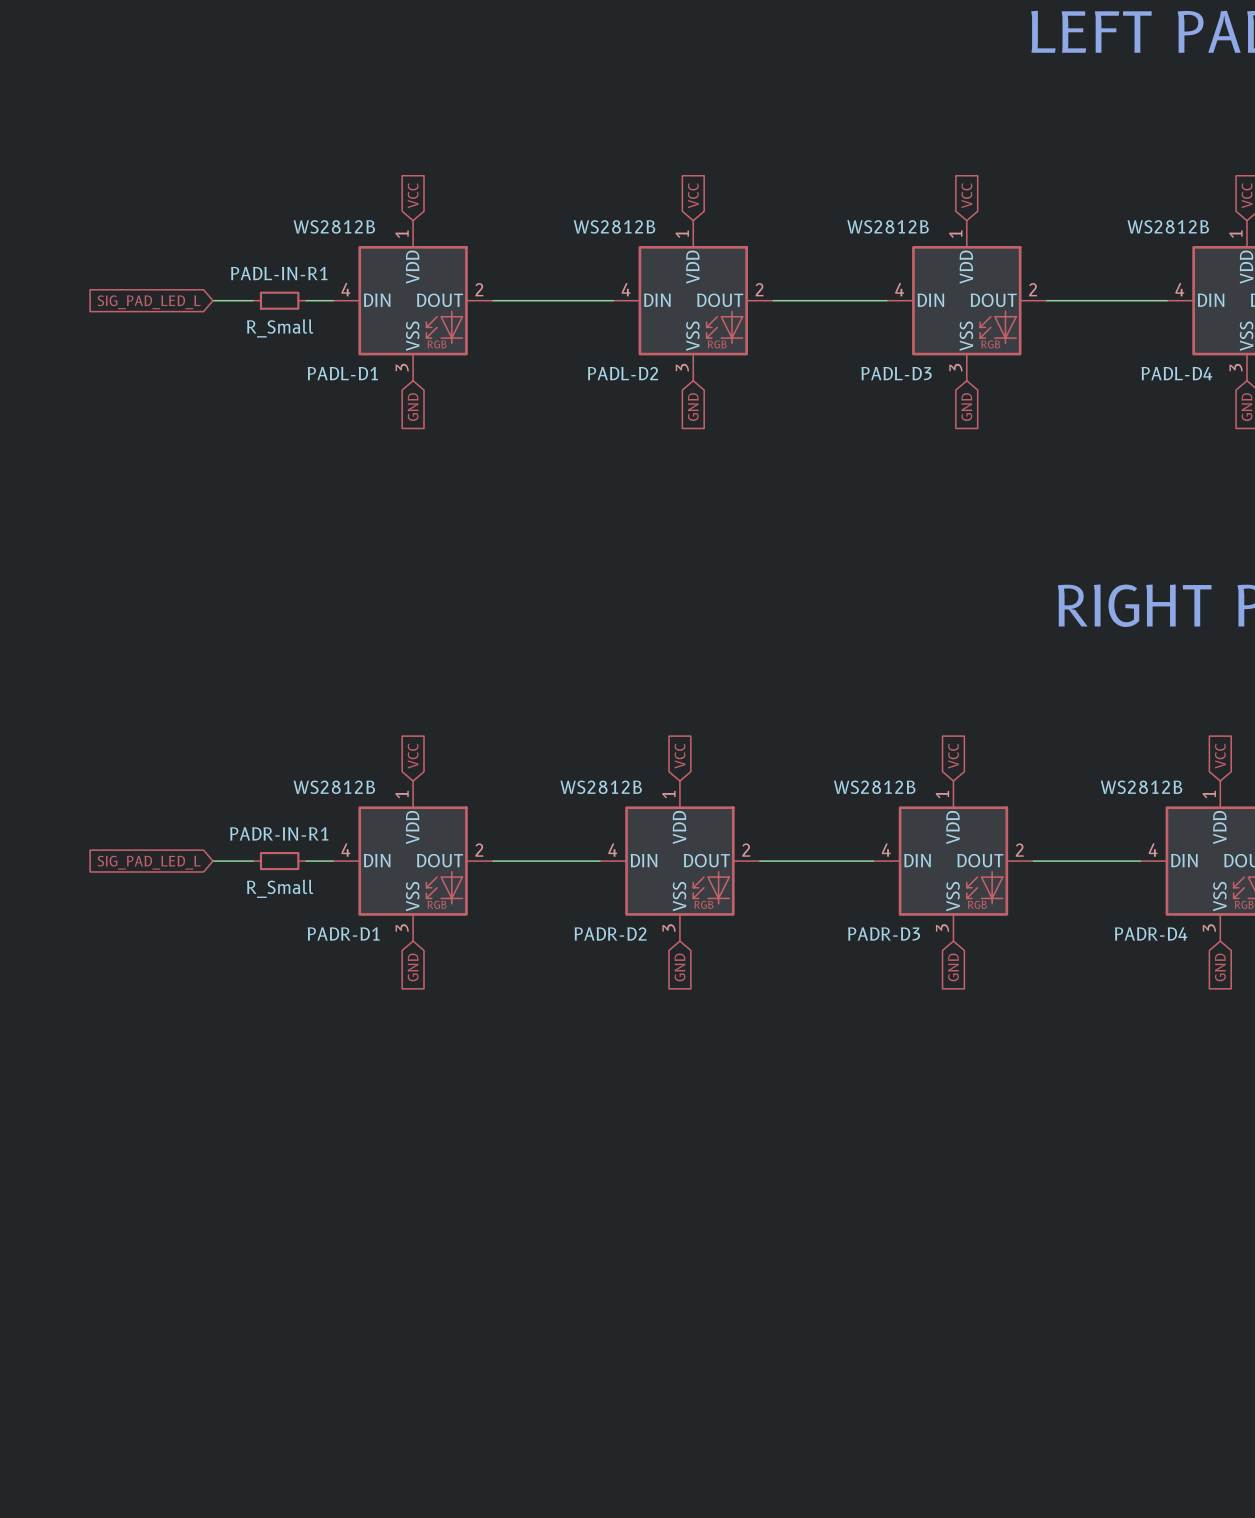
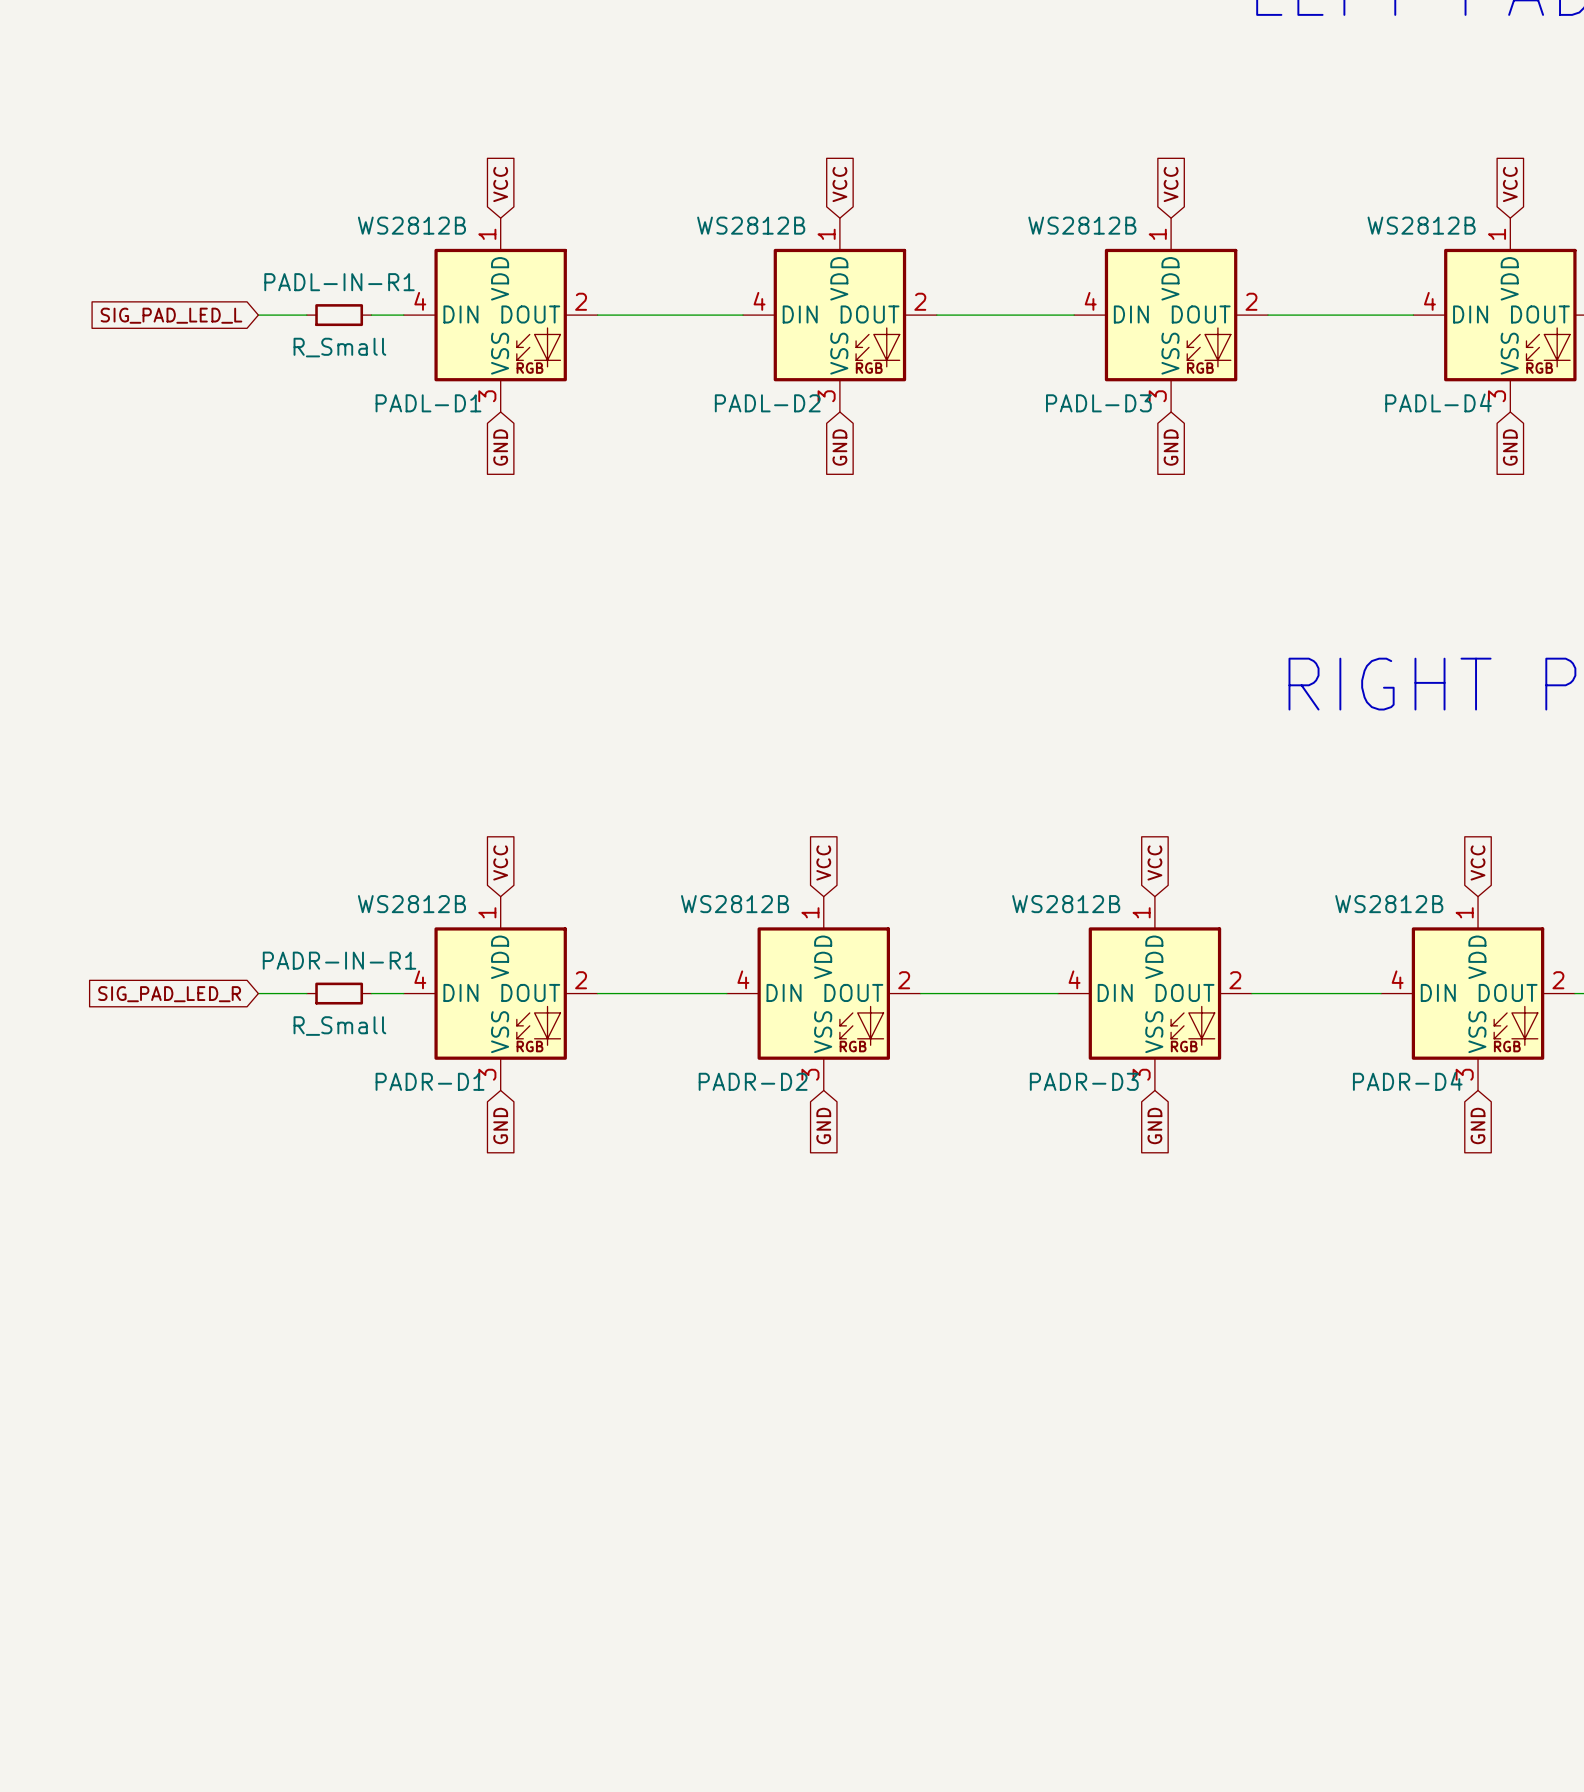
global label: SIG_PAD_LED_L (149, 862) -> SIG_PAD_LED_R (169, 994)

